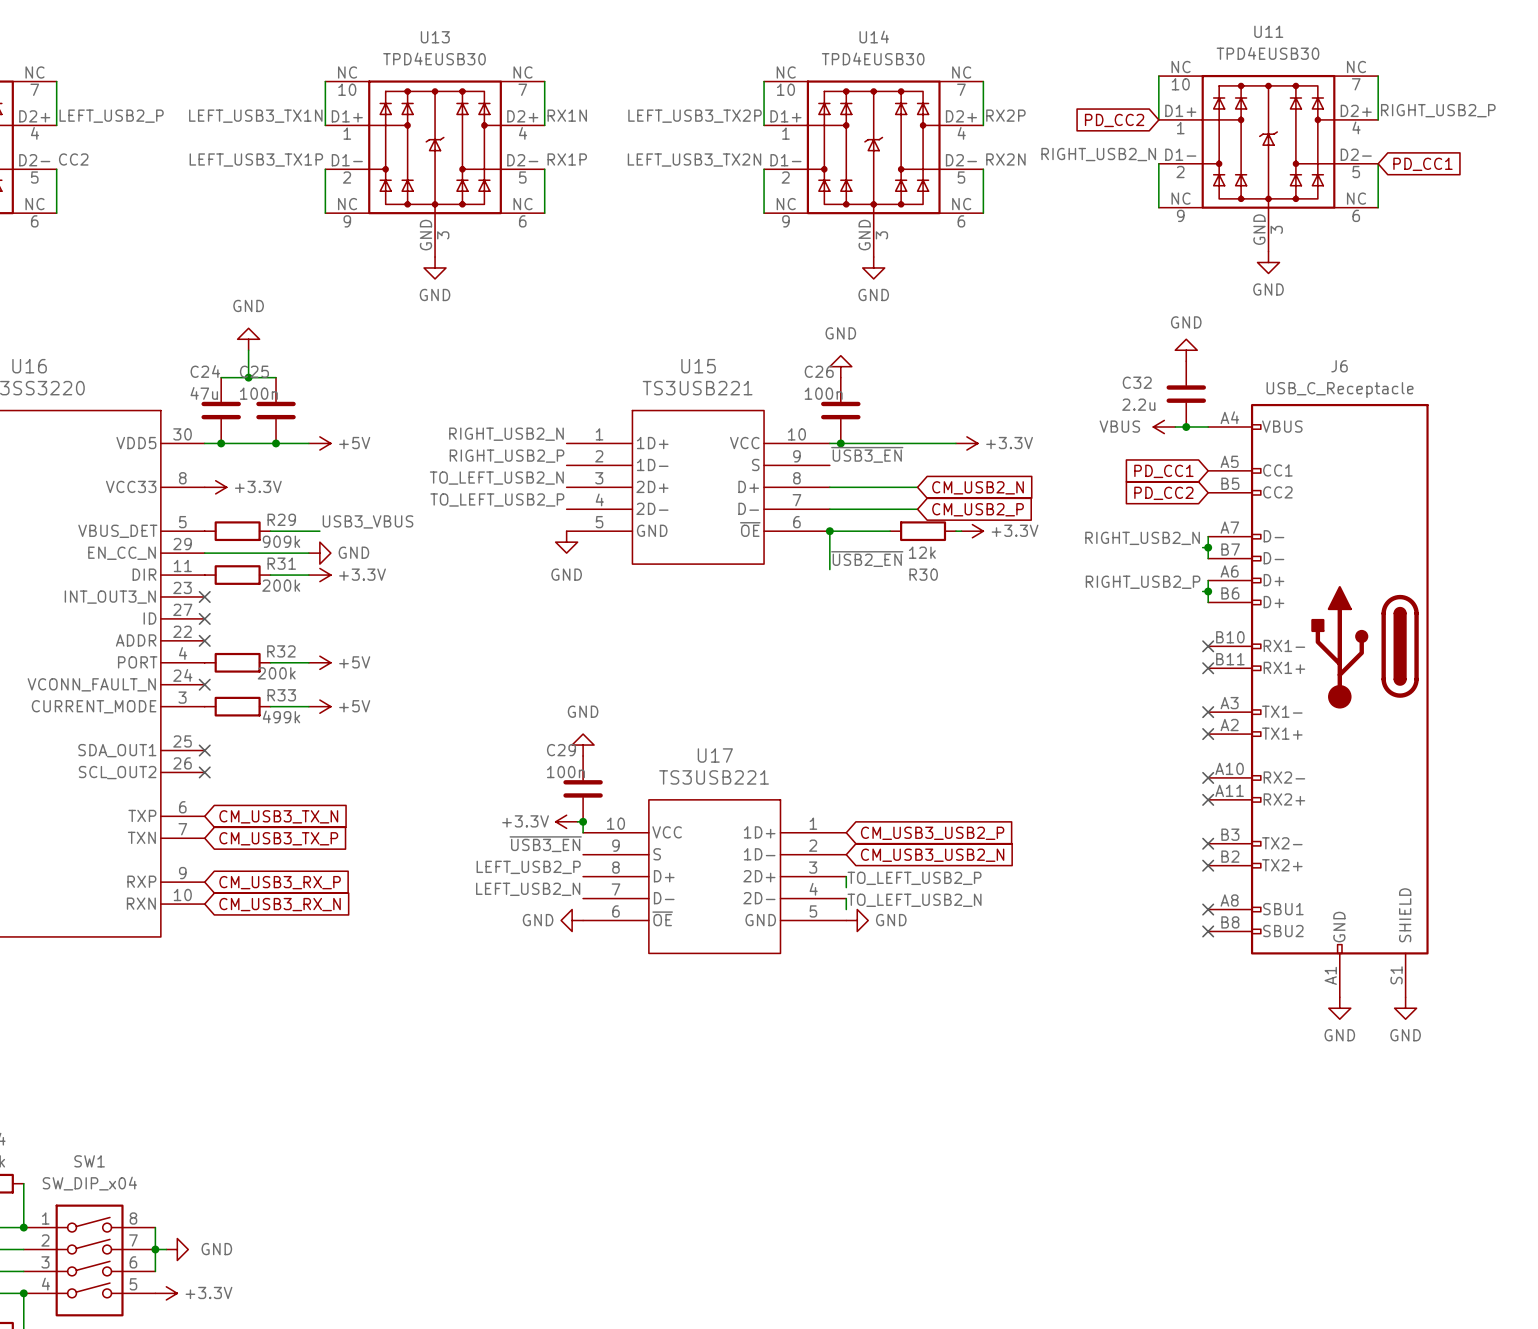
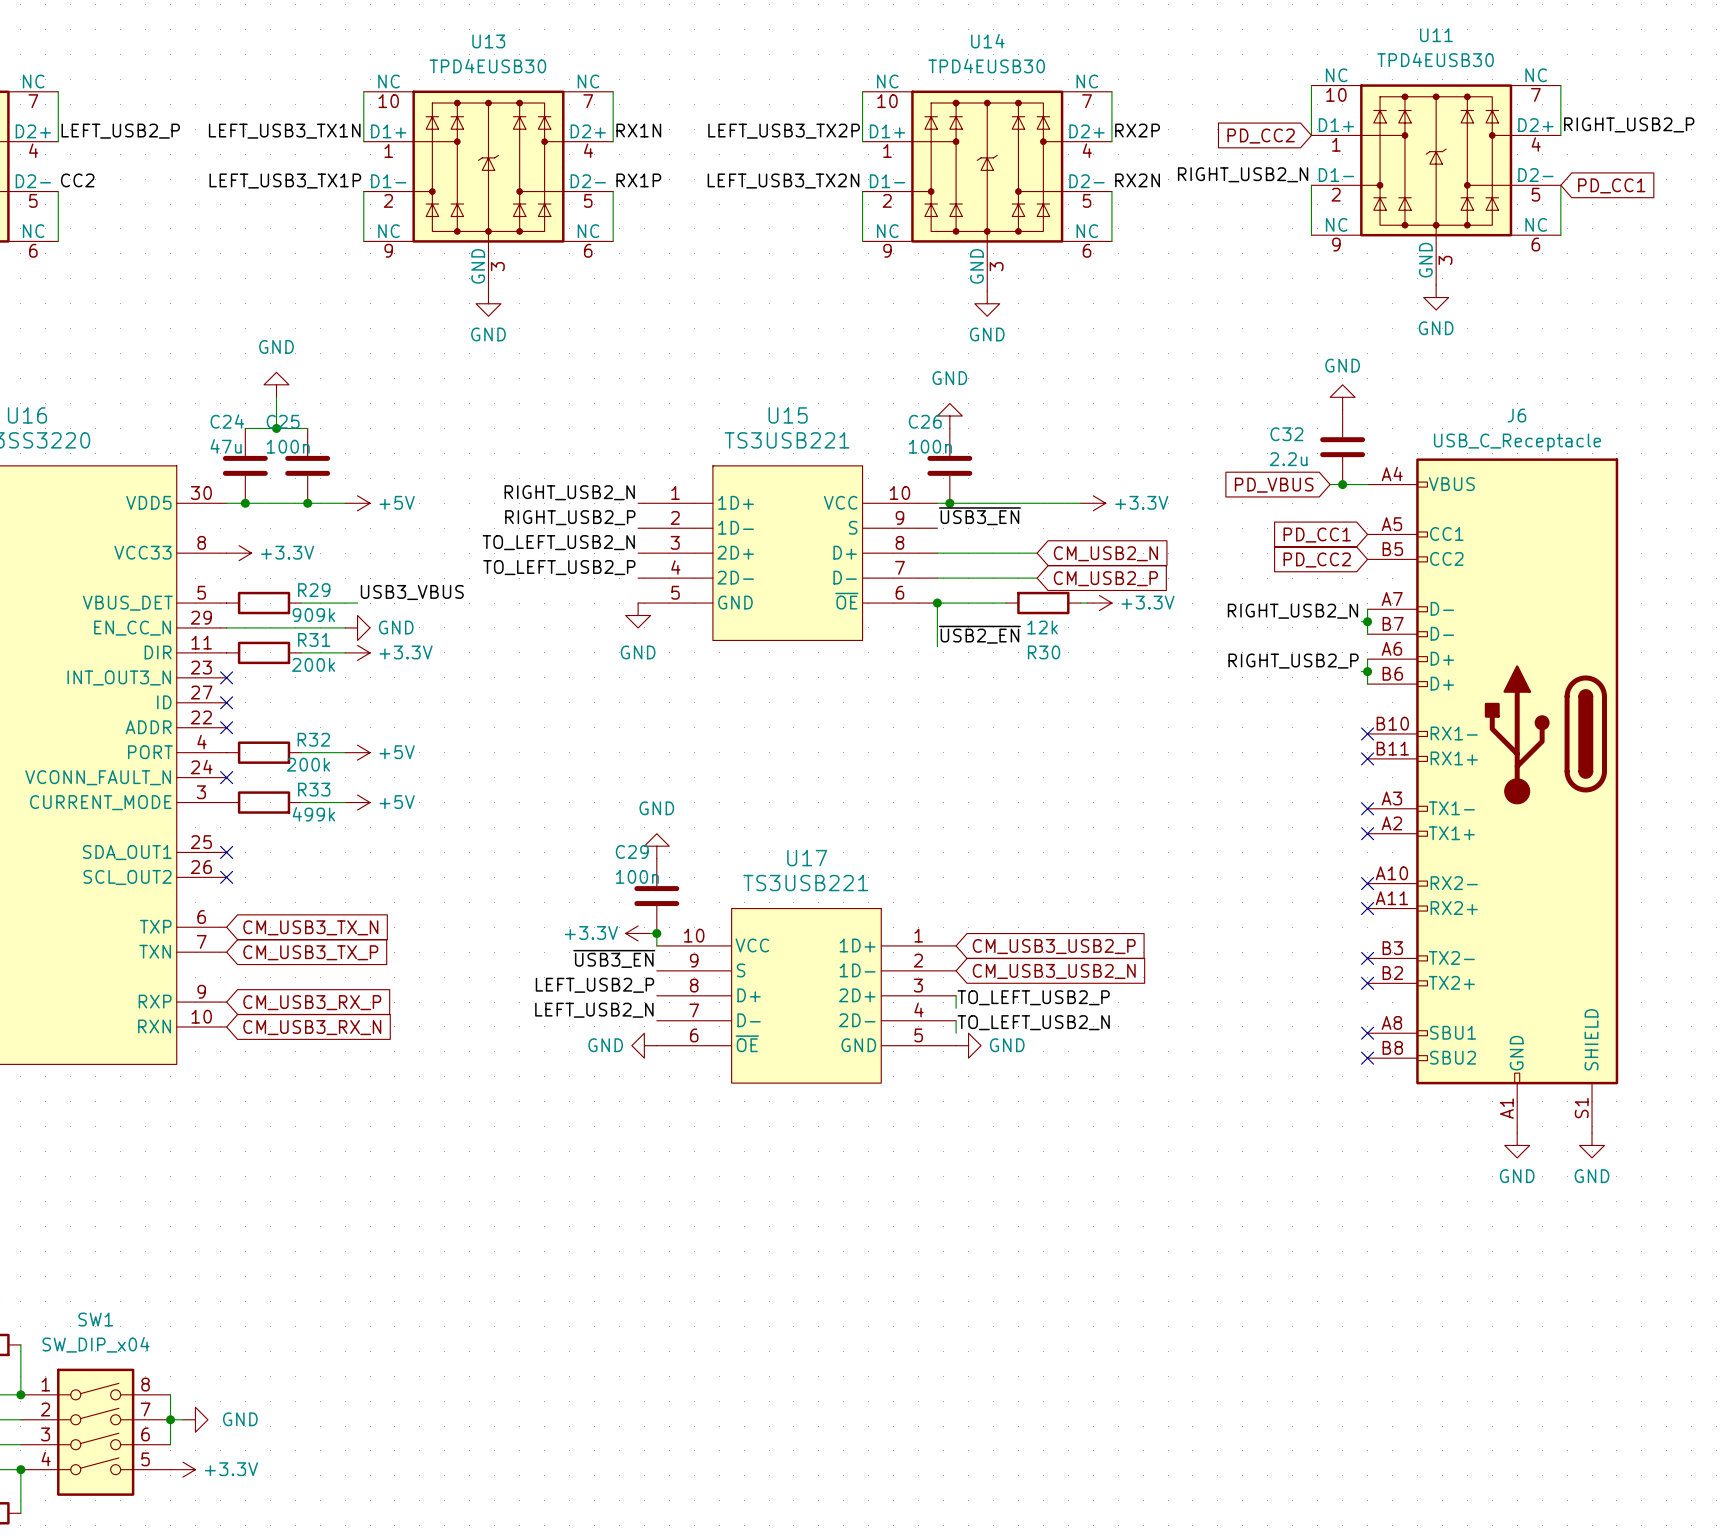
global label: none -> PD_VBUS (1274, 485)
power symbol: VBUS (1164, 427) -> none

